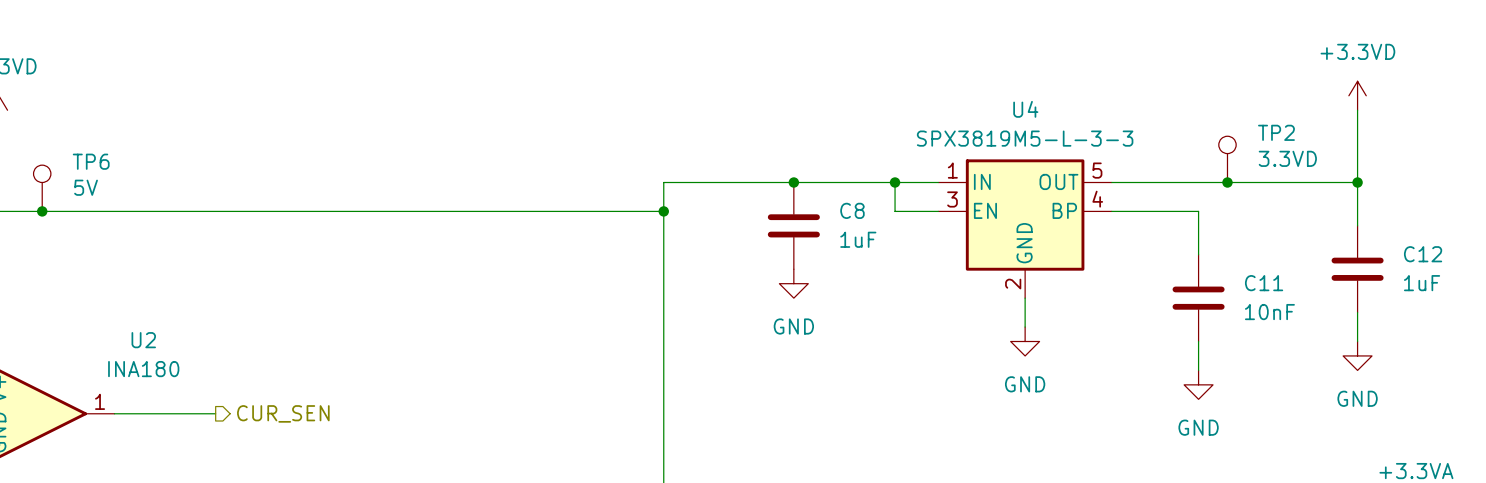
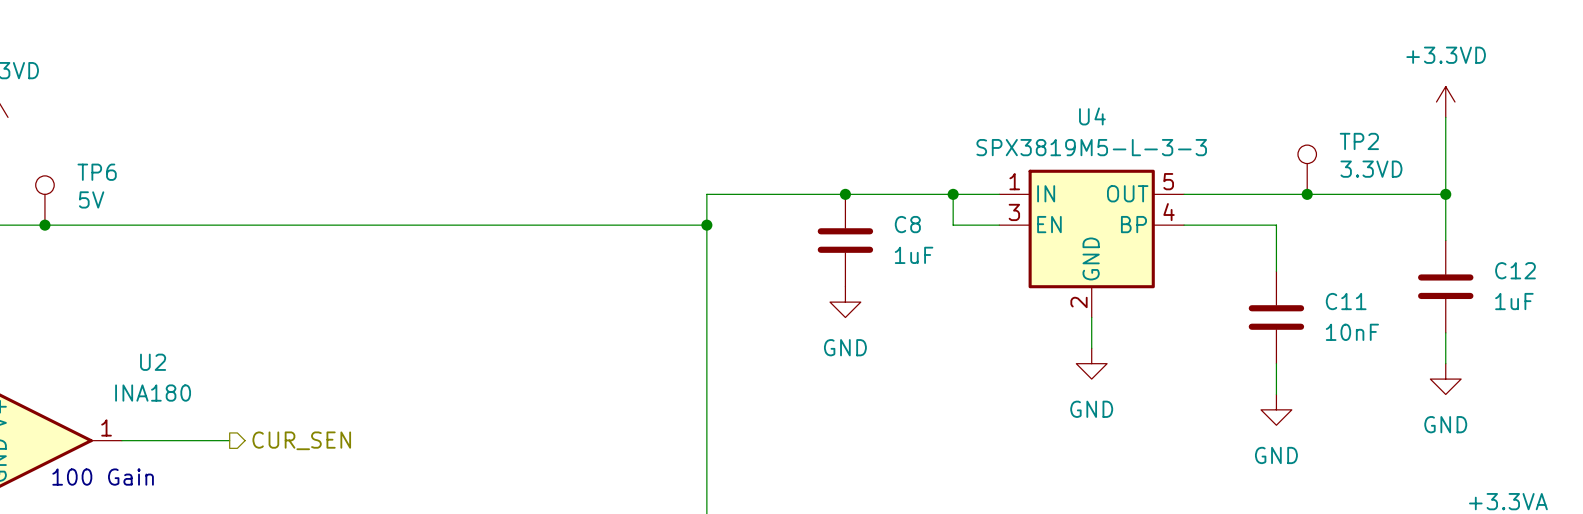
text: none -> 100 Gain (103, 477)

